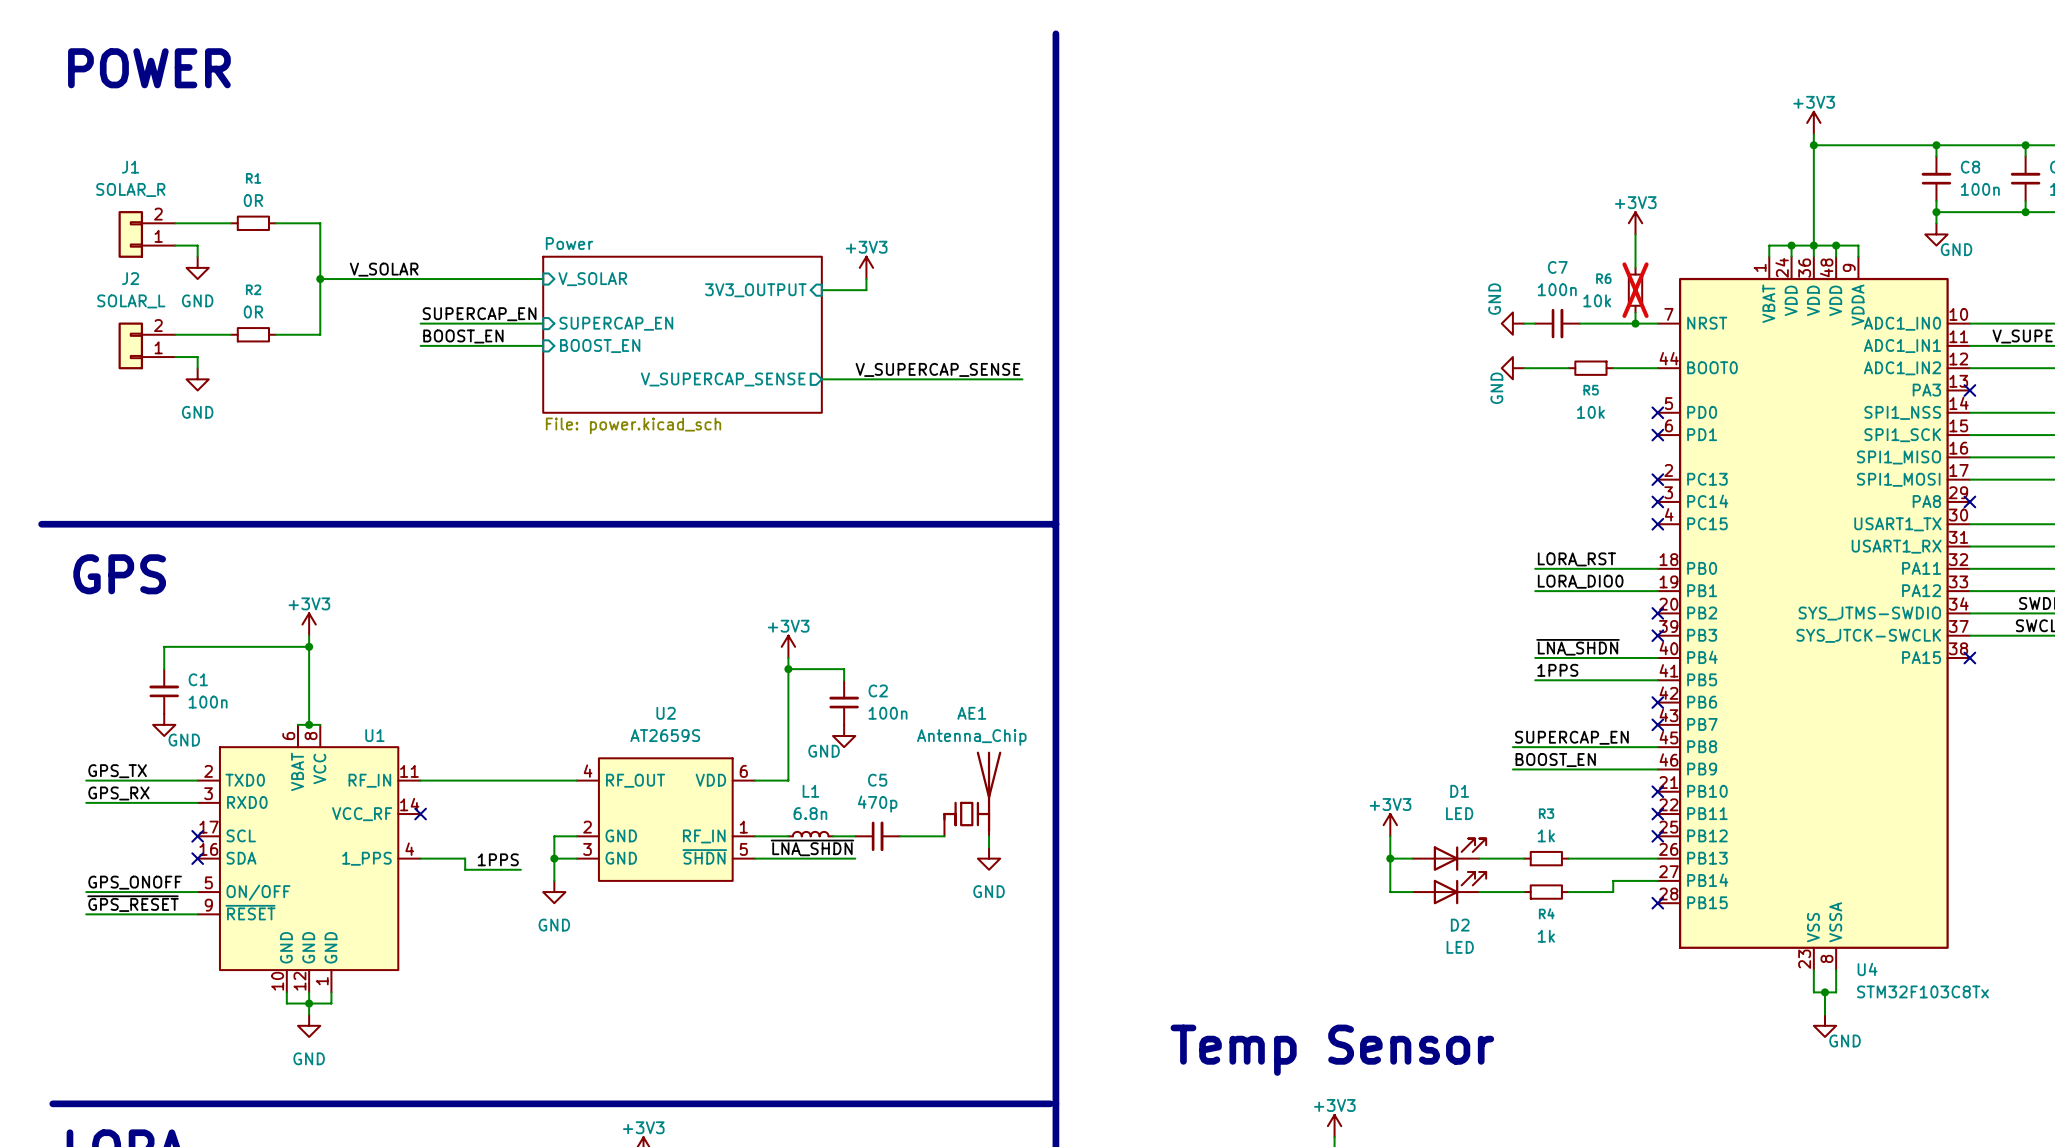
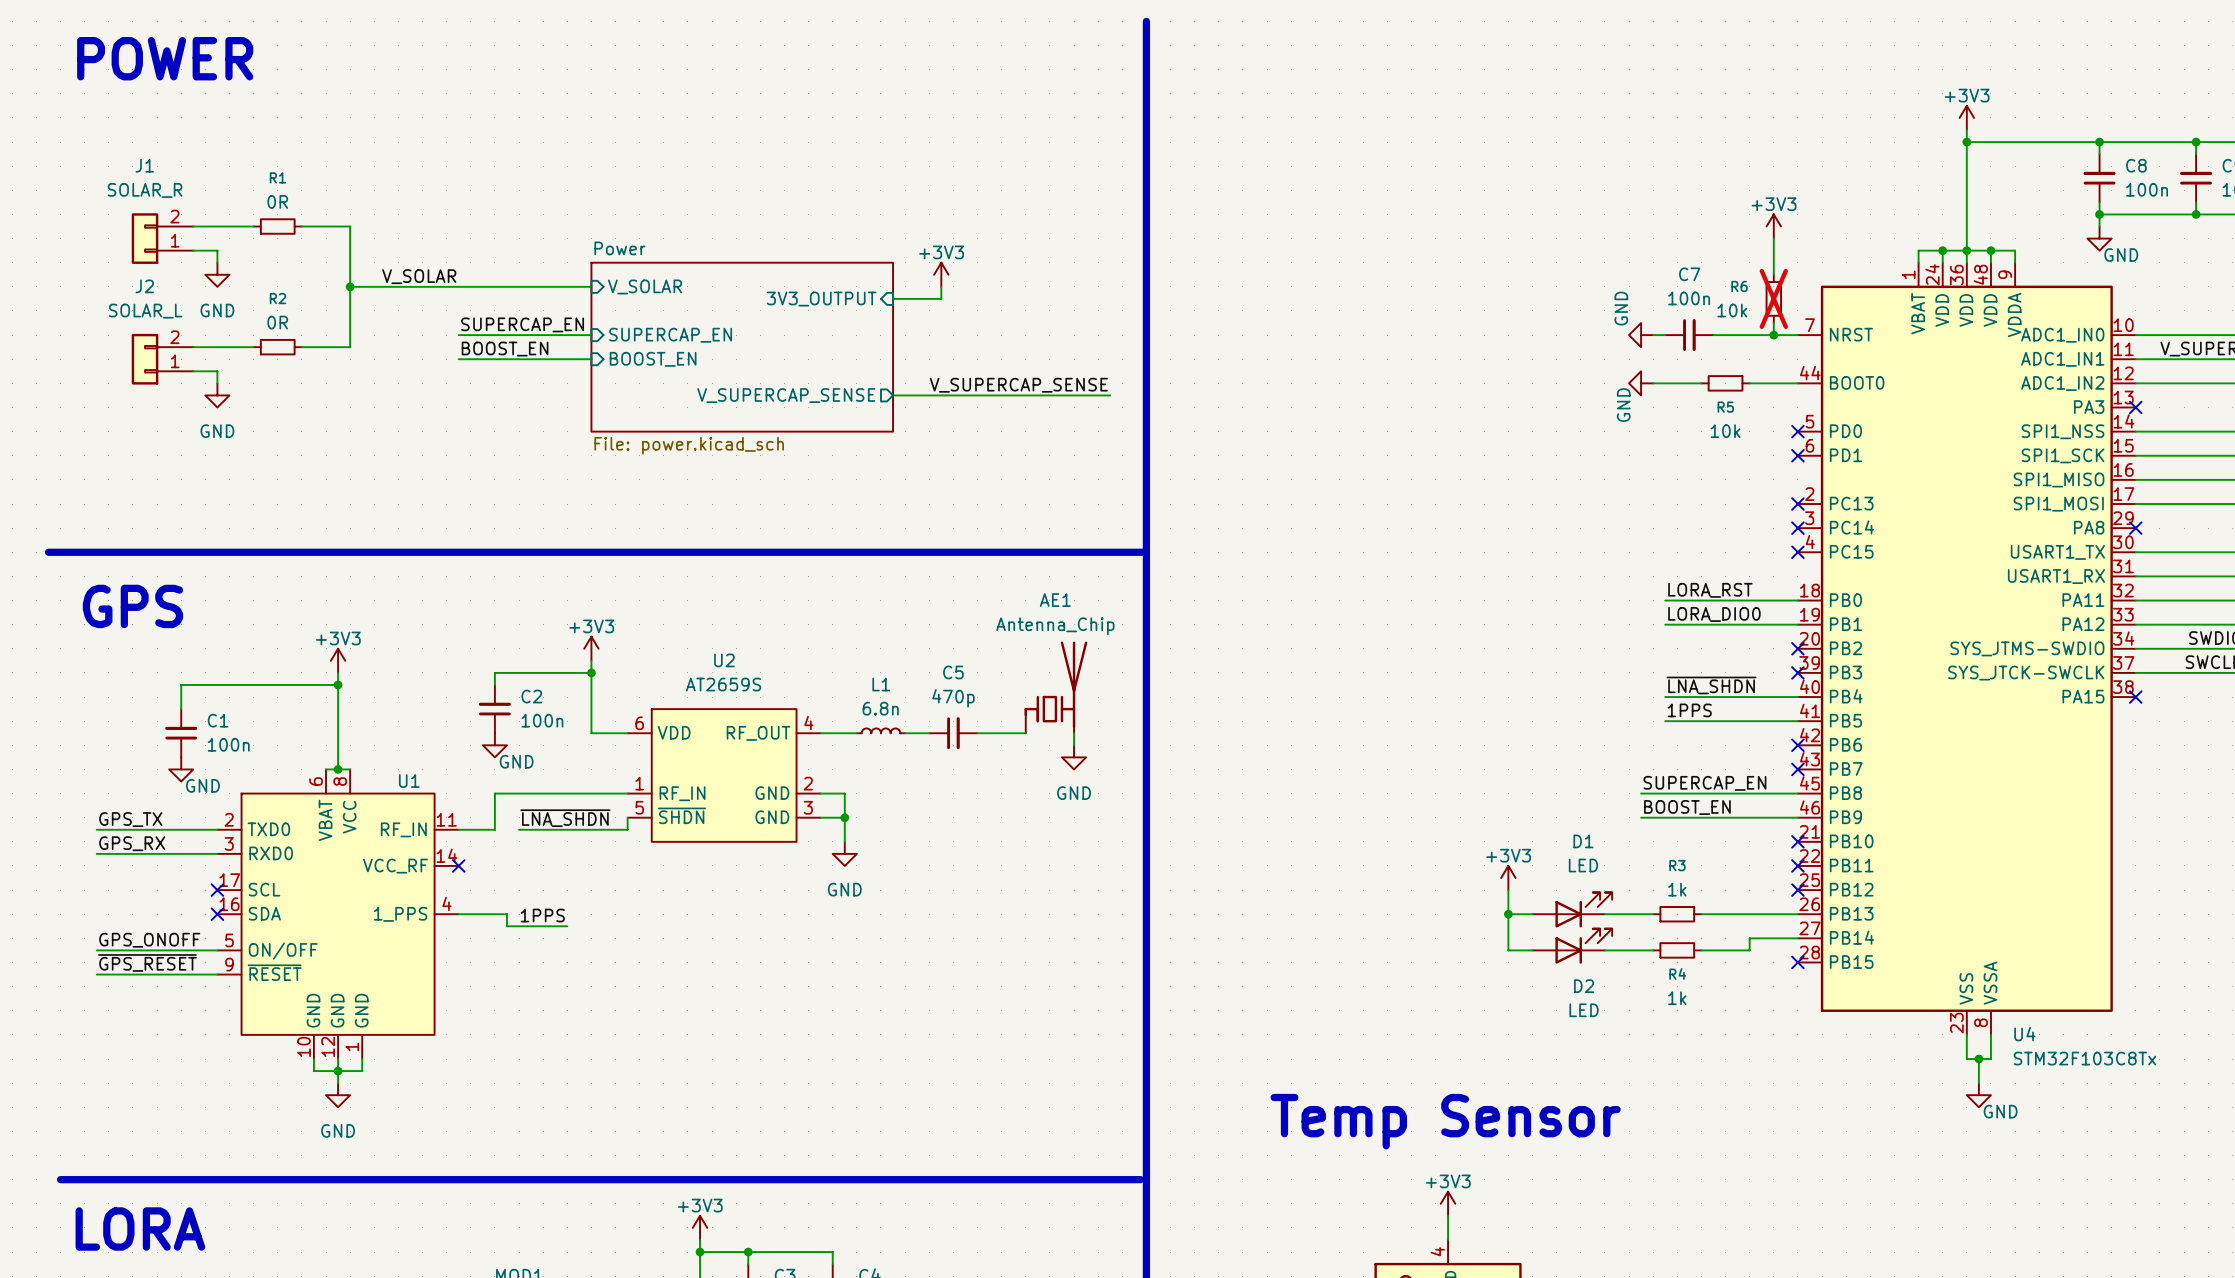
power symbol: none -> +3V3 (591, 648)
wire: none -> (591, 660) (591, 733) (627, 733)
wire: none -> (591, 672) (494, 672) (494, 684)
junction: none -> (591, 672)
power symbol: +3V3 (788, 646) -> none
wire: (788, 657) (788, 780) (754, 780) -> none
wire: (788, 669) (844, 669) (844, 680) -> none
junction: (788, 669) -> none
power symbol: none -> GND (494, 745)
C2 position: (844, 702) -> (494, 709)
power symbol: none -> GND (1074, 757)
power symbol: GND (844, 736) -> none
wire: none -> (820, 793) (844, 793) (844, 841)
label: none -> ~{LNA_SHDN} (565, 818)
wire: none -> (627, 817) (627, 829)
wire: none -> (820, 817) (844, 817)
junction: none -> (844, 817)
wire: (454, 780) (476, 780) -> (494, 829) (494, 793) (627, 793)
AE1 position: (972, 793) -> (1055, 687)
power symbol: none -> GND (844, 853)
U2 flip: as is (665, 819) -> left-right (724, 775)
L1 position: (810, 834) -> (880, 730)
wire: (576, 836) (554, 836) (554, 880) -> none
wire: (754, 836) (788, 836) -> (820, 733) (856, 733)
wire: (832, 836) (855, 836) -> (905, 733) (929, 733)
C5 position: (877, 836) -> (953, 733)
wire: (899, 836) (944, 836) -> (977, 733) (1025, 733)
wire: (989, 836) (989, 847) -> (1074, 733) (1074, 745)
label: ~{LNA_SHDN} (812, 847) -> none
wire: (554, 858) (576, 858) -> none
junction: (554, 858) -> none
wire: (754, 858) (855, 858) -> none
power symbol: GND (989, 858) -> none
power symbol: GND (554, 892) -> none

